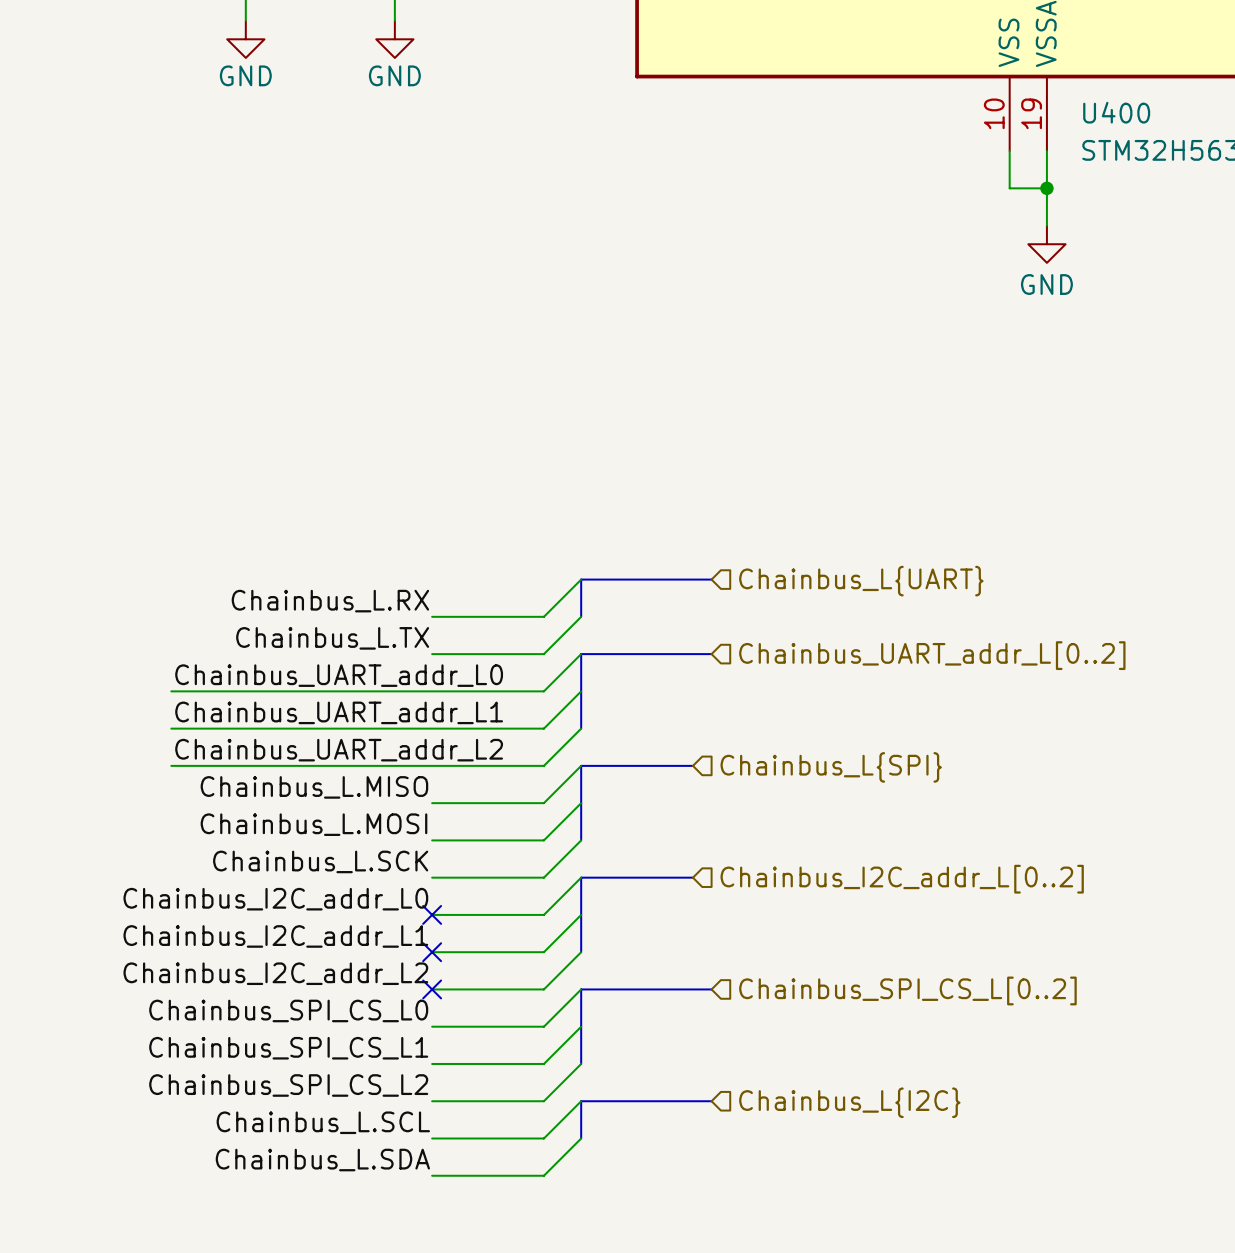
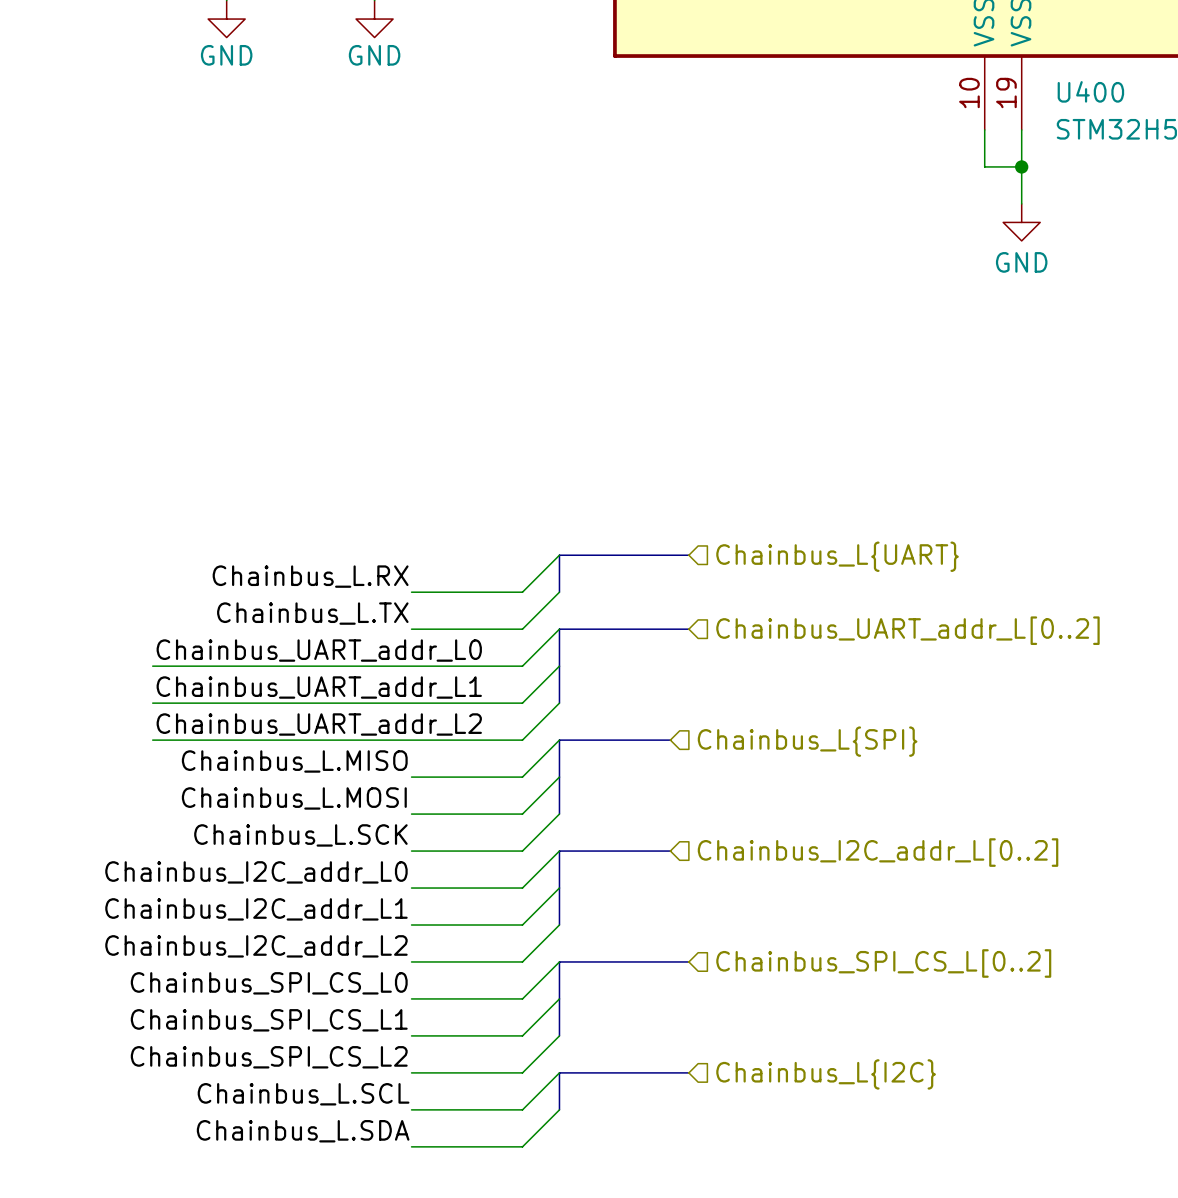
no-connect mark: (432, 914) -> none
no-connect mark: (432, 952) -> none
no-connect mark: (432, 989) -> none

